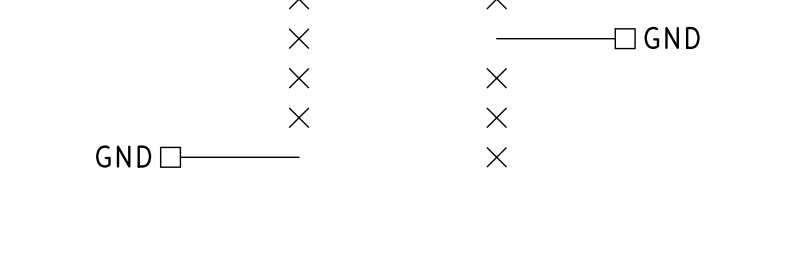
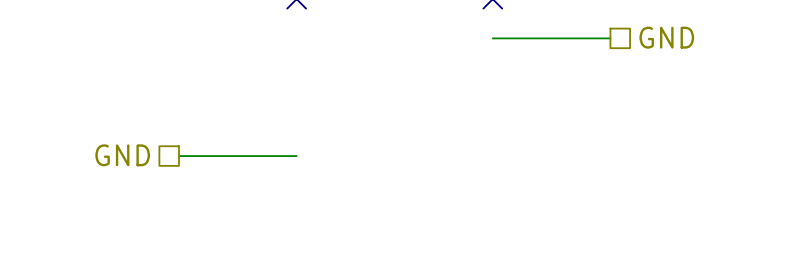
no-connect mark: (299, 38) -> none
no-connect mark: (299, 78) -> none
no-connect mark: (496, 78) -> none
no-connect mark: (299, 117) -> none
no-connect mark: (496, 117) -> none
no-connect mark: (496, 157) -> none

